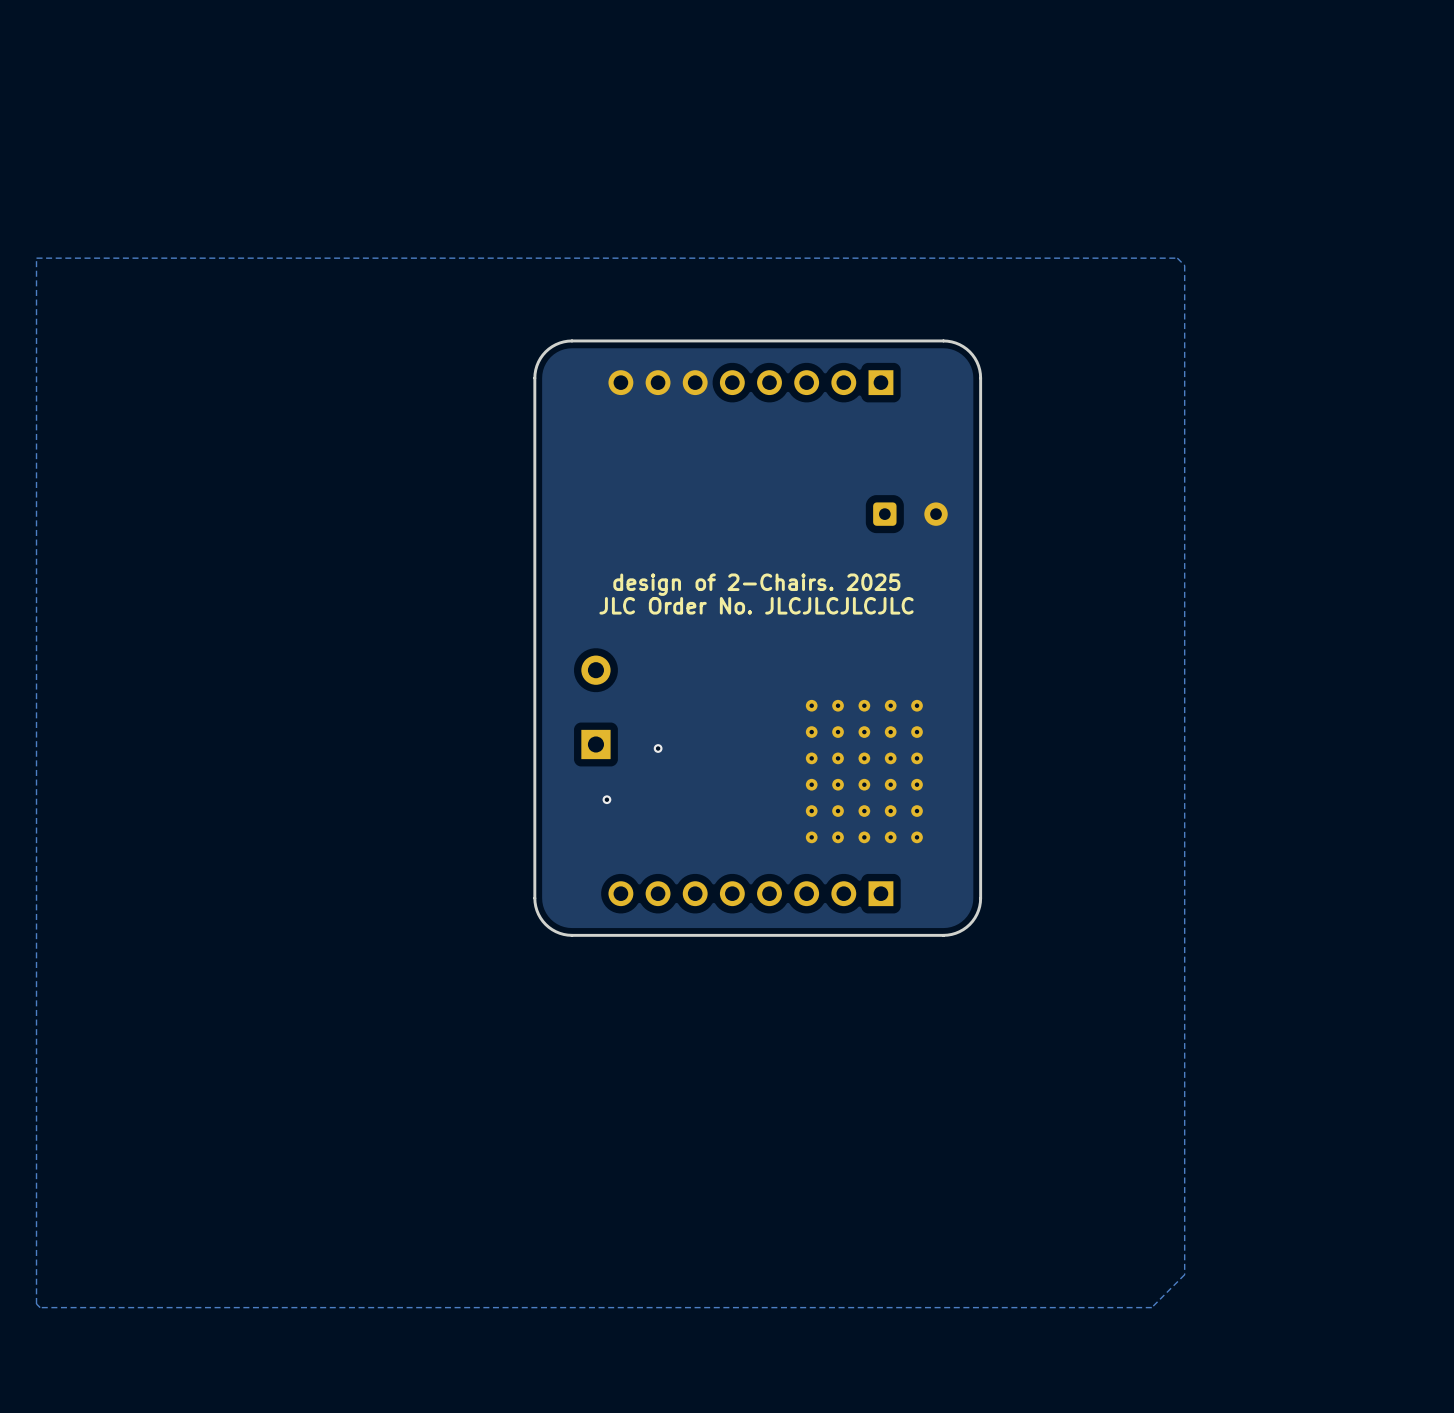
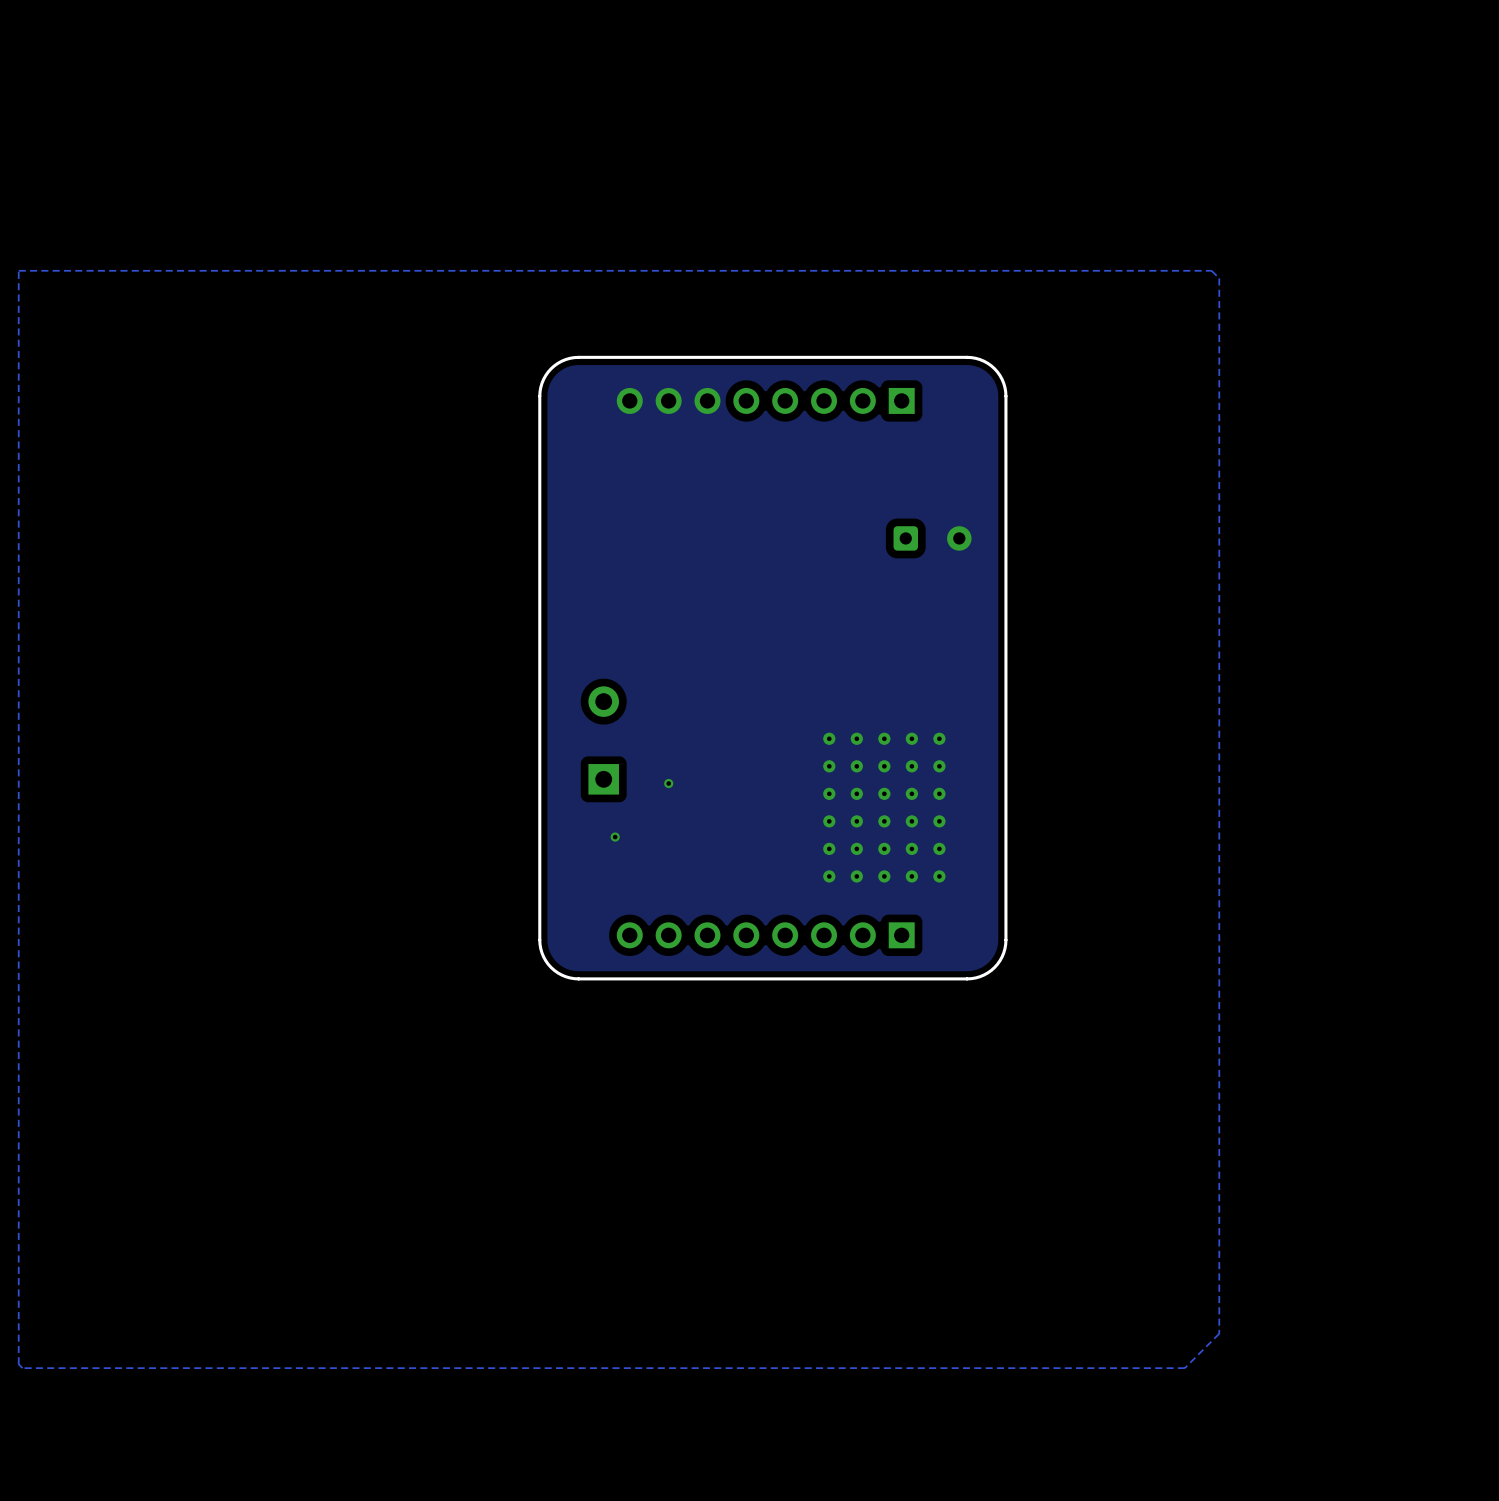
text: design of 2-Chairs. 2025 (756, 584) -> none
text: JLC Order No. JLCJLCJLCJLC (756, 605) -> none

